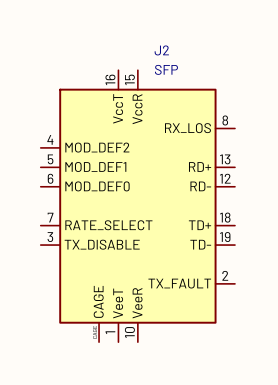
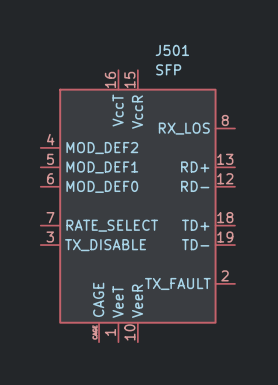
J2 name: J2 (161, 50) -> J501 (172, 50)

